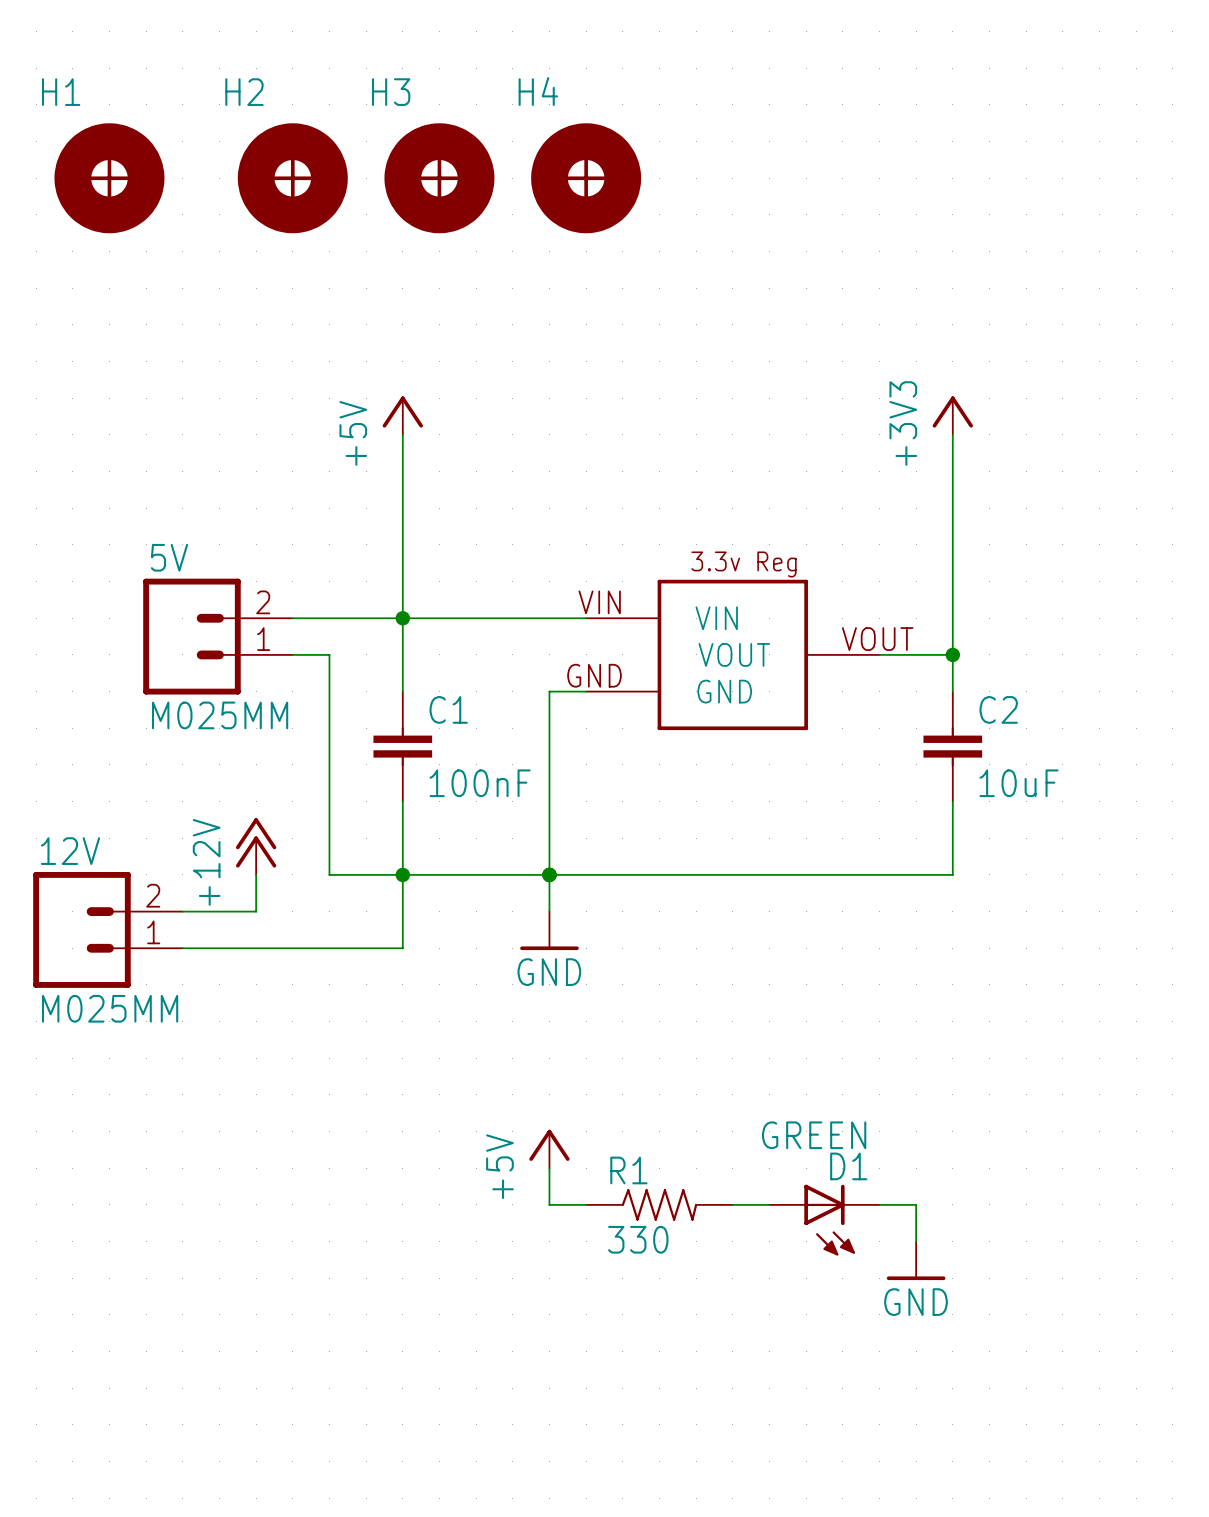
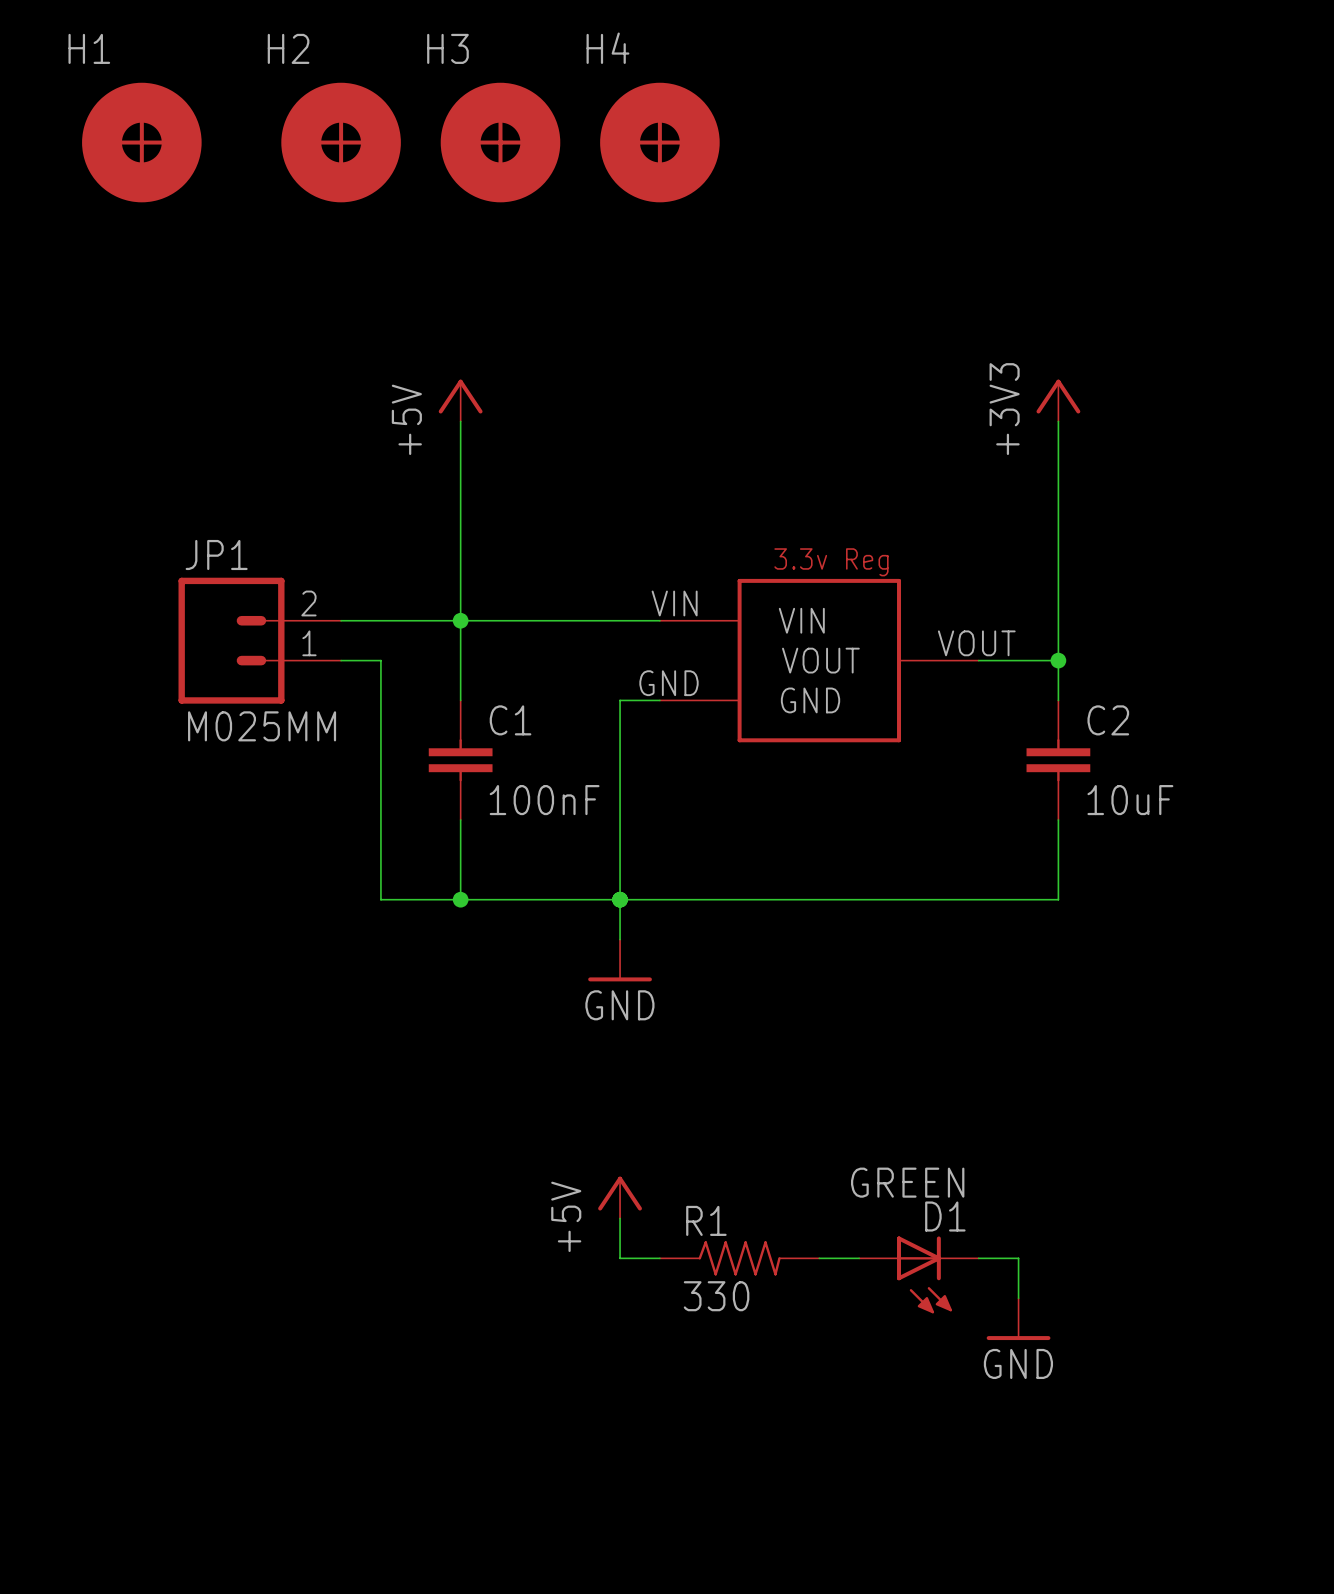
5V name: 5V (169, 557) -> JP1 (216, 554)
power symbol: +12V (256, 846) -> none
wire: (256, 874) (256, 911) (182, 911) -> none
wire: (402, 874) (402, 948) (182, 948) -> none
12V: M025MM (108, 929) -> none

